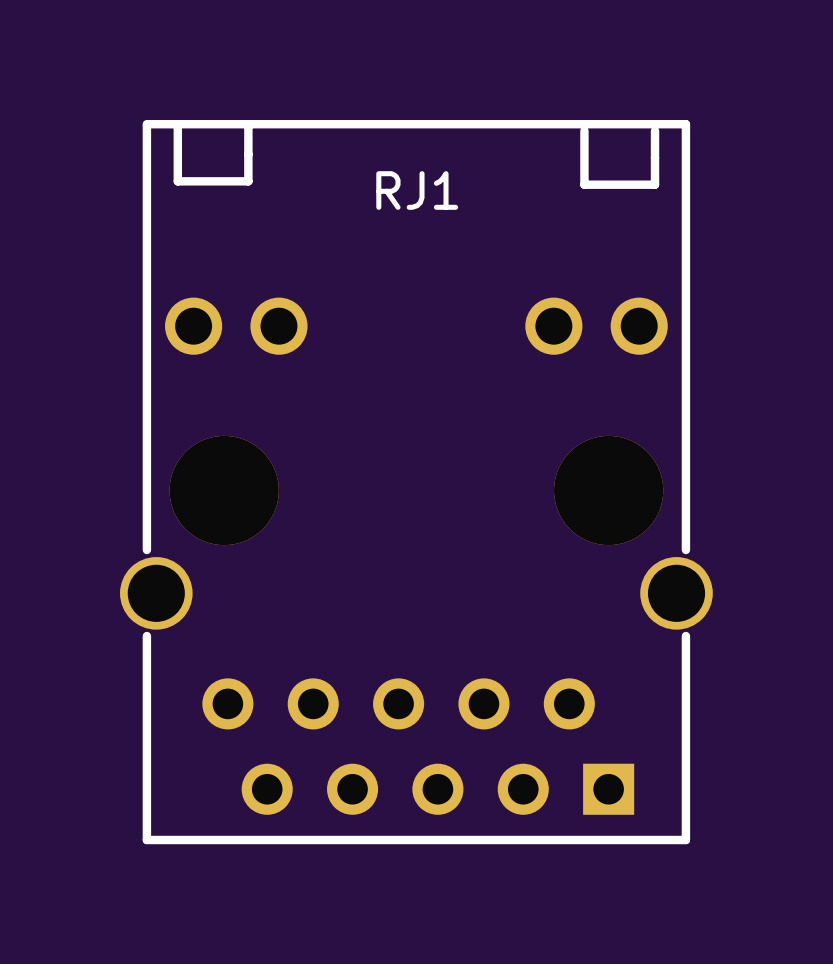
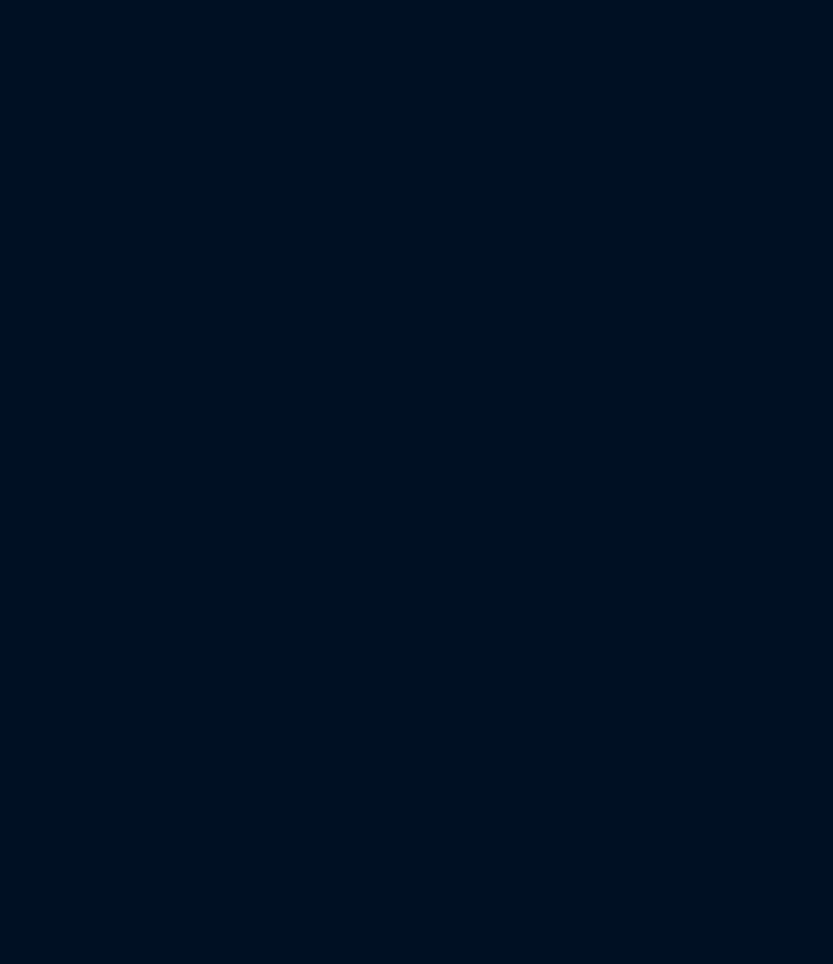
RJ1: (416, 482) -> none

